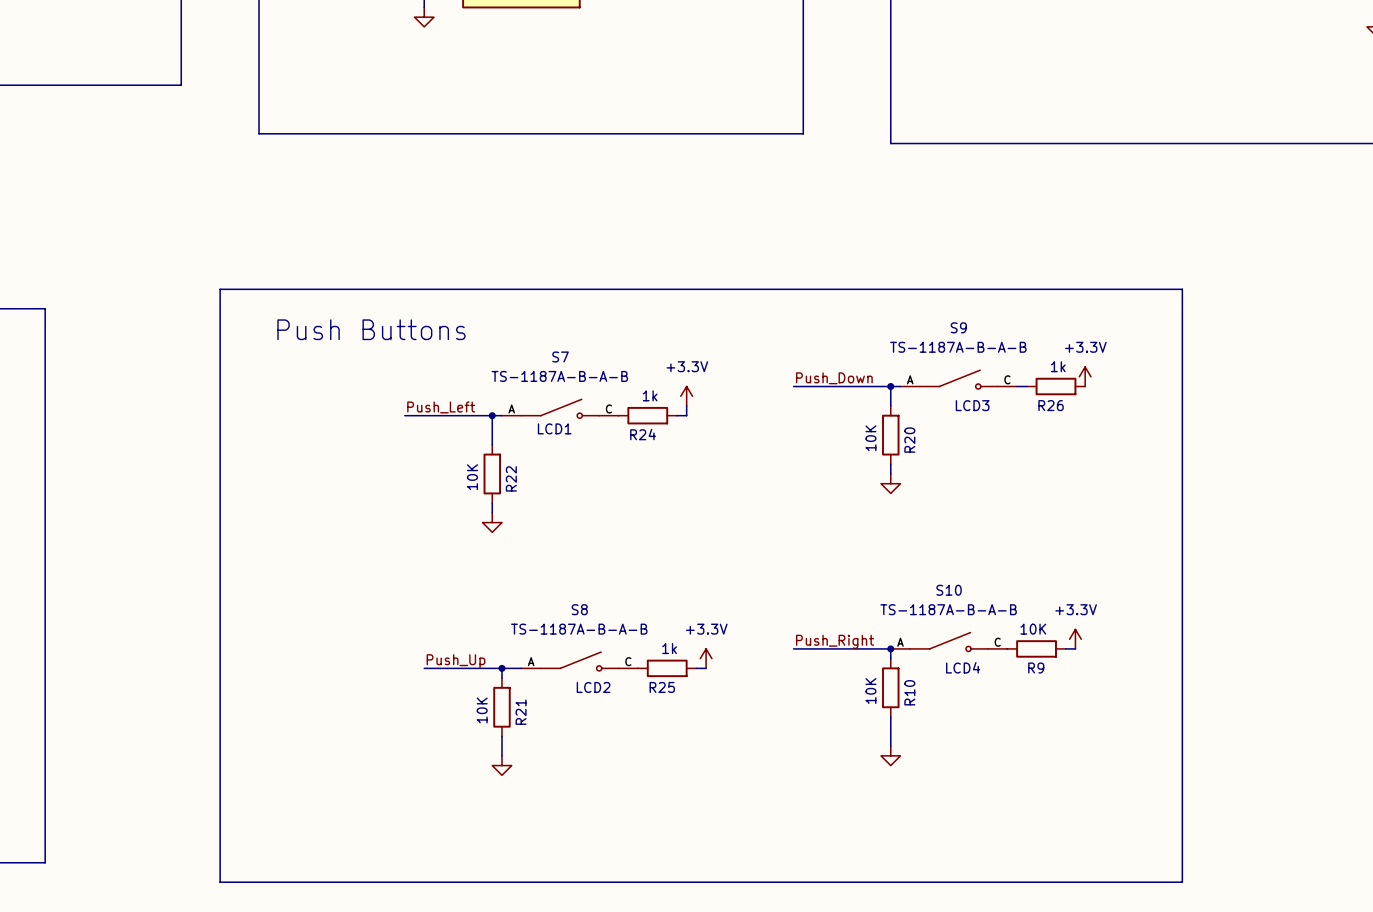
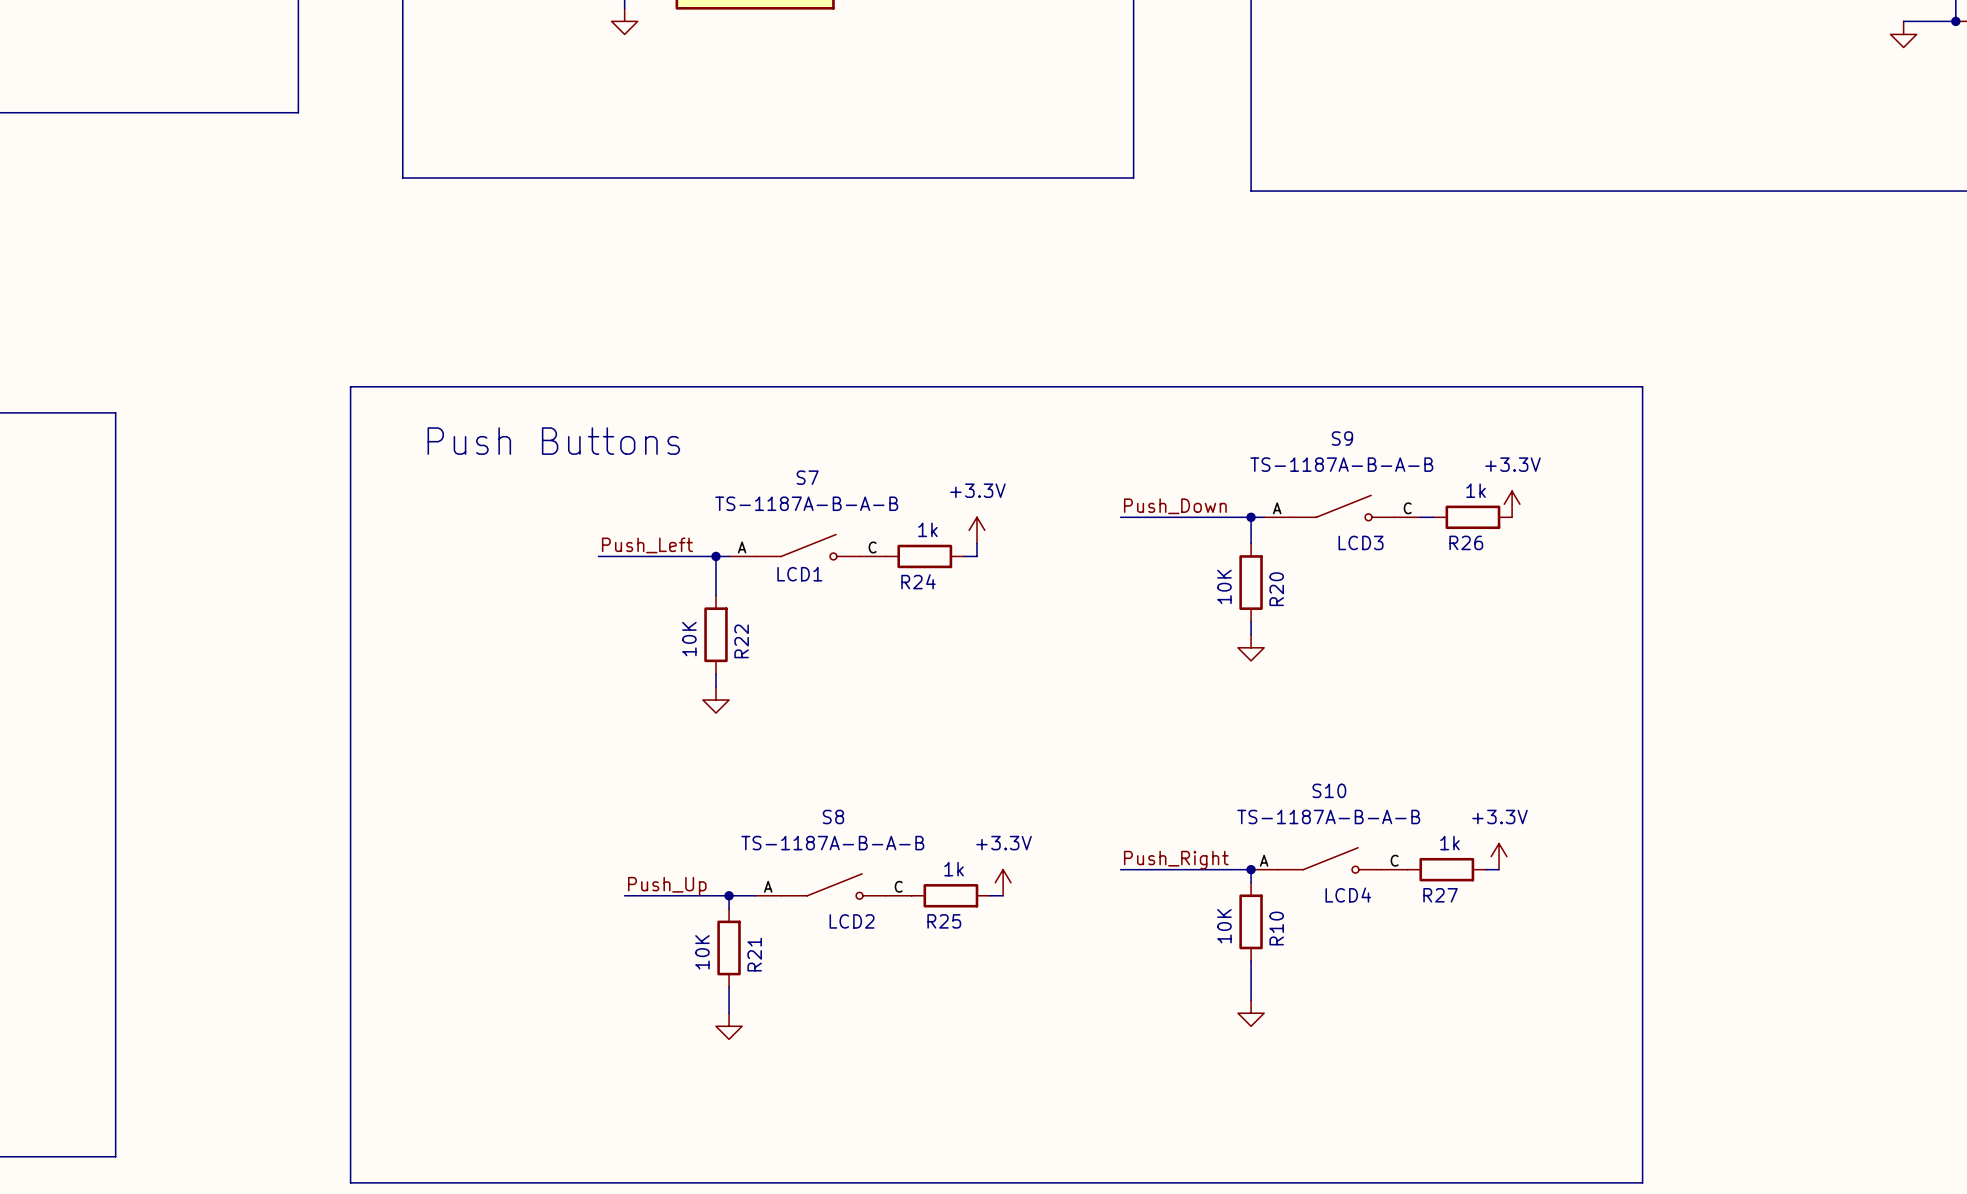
R9 value: 10K (1033, 629) -> 1k (1449, 843)
R9 name: R9 (1036, 668) -> R27 (1440, 895)

